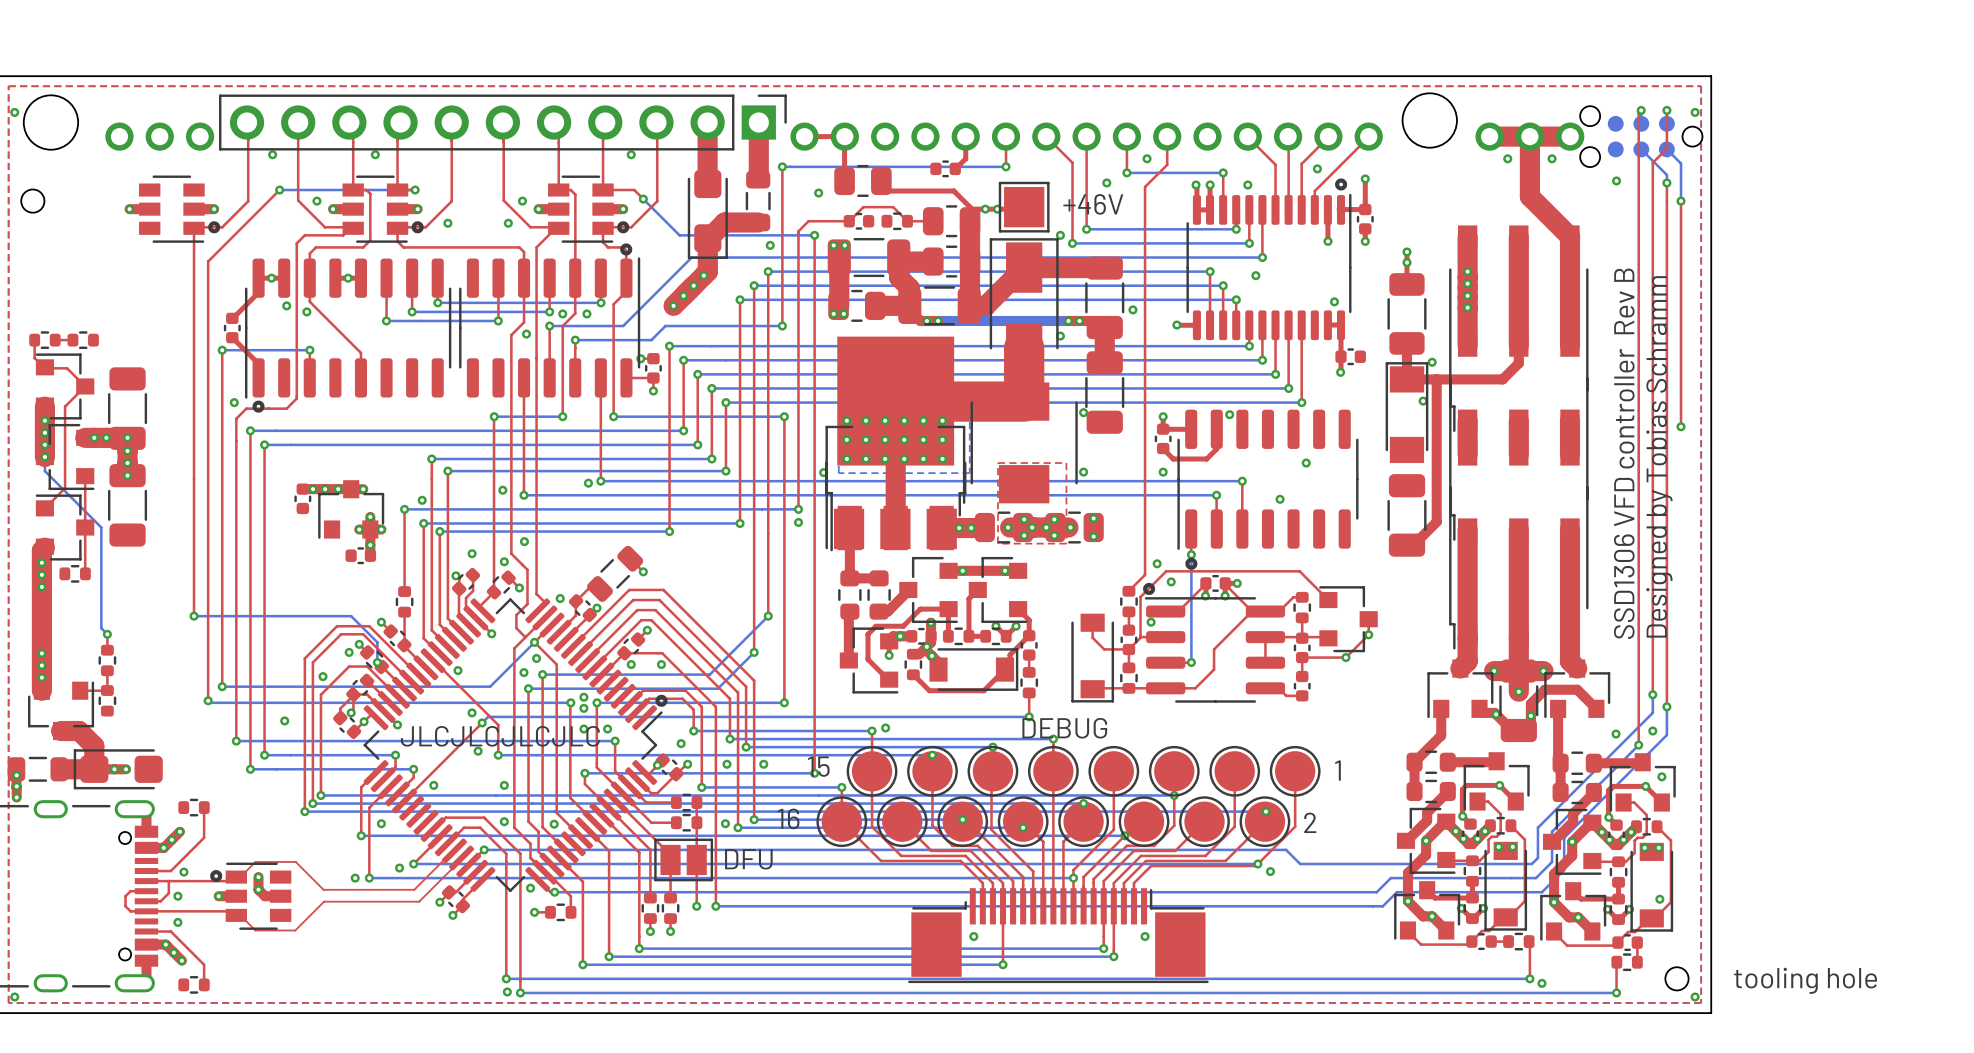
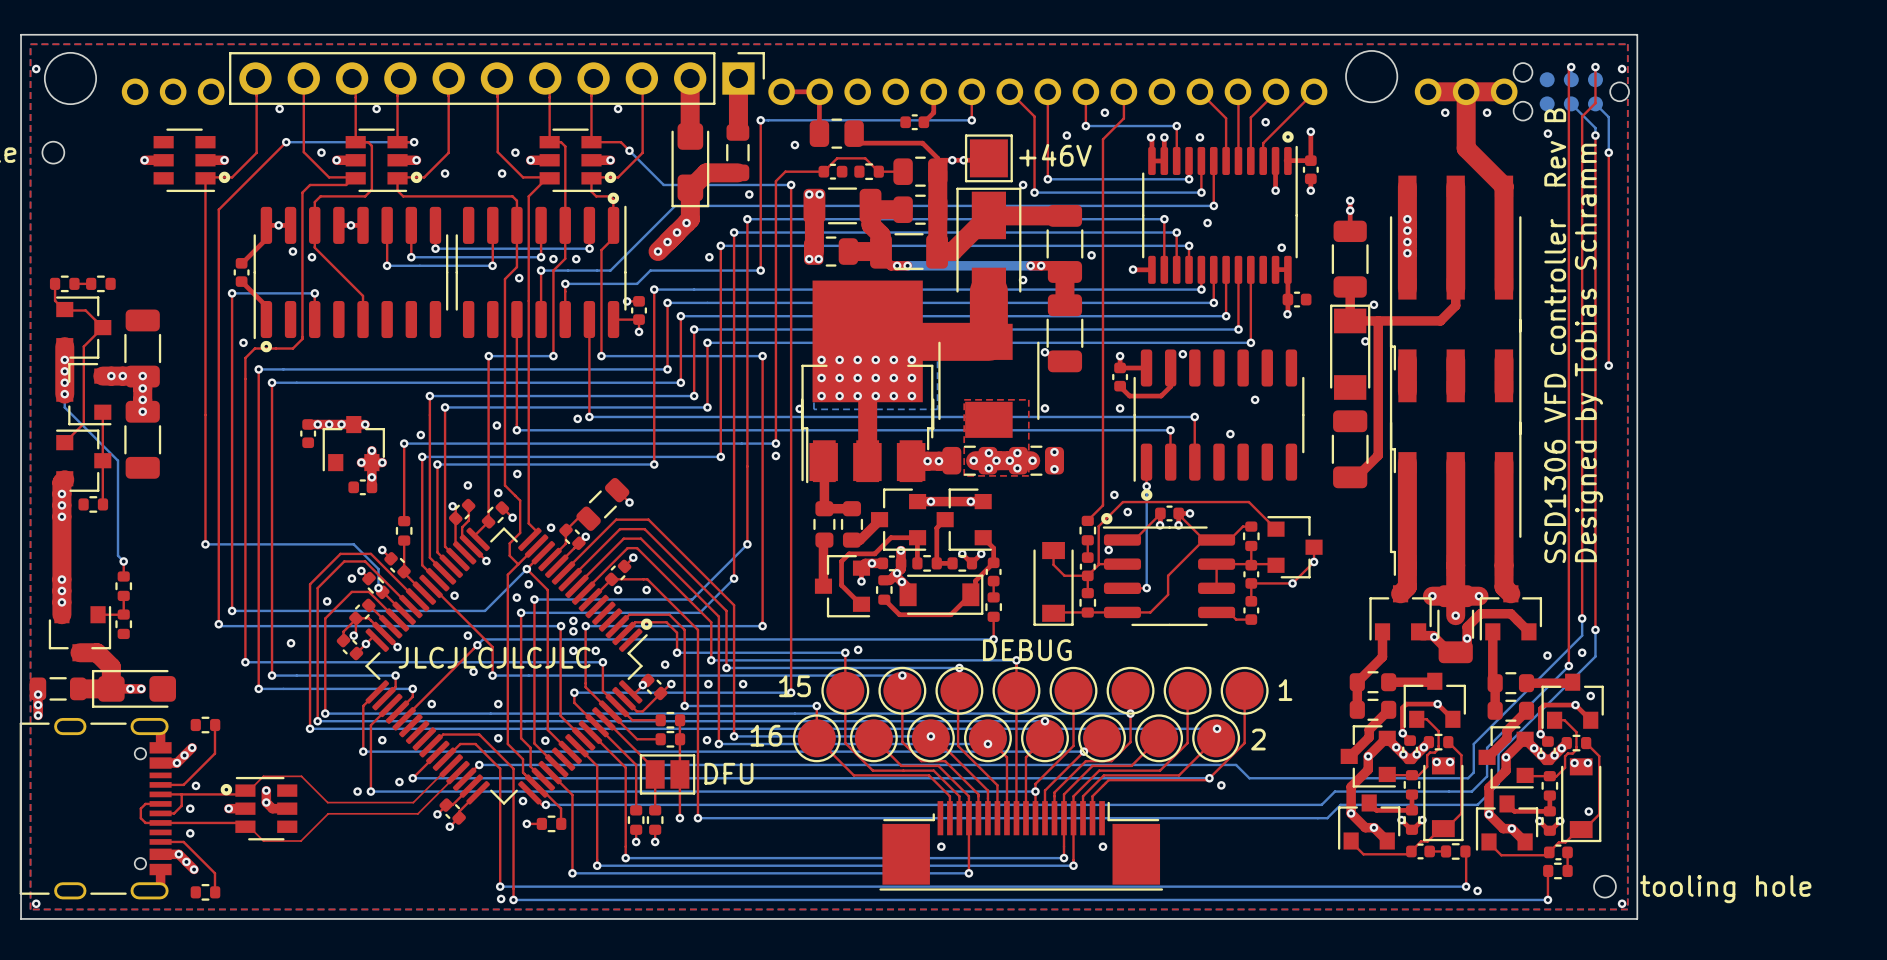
via: none -> (709, 257)

